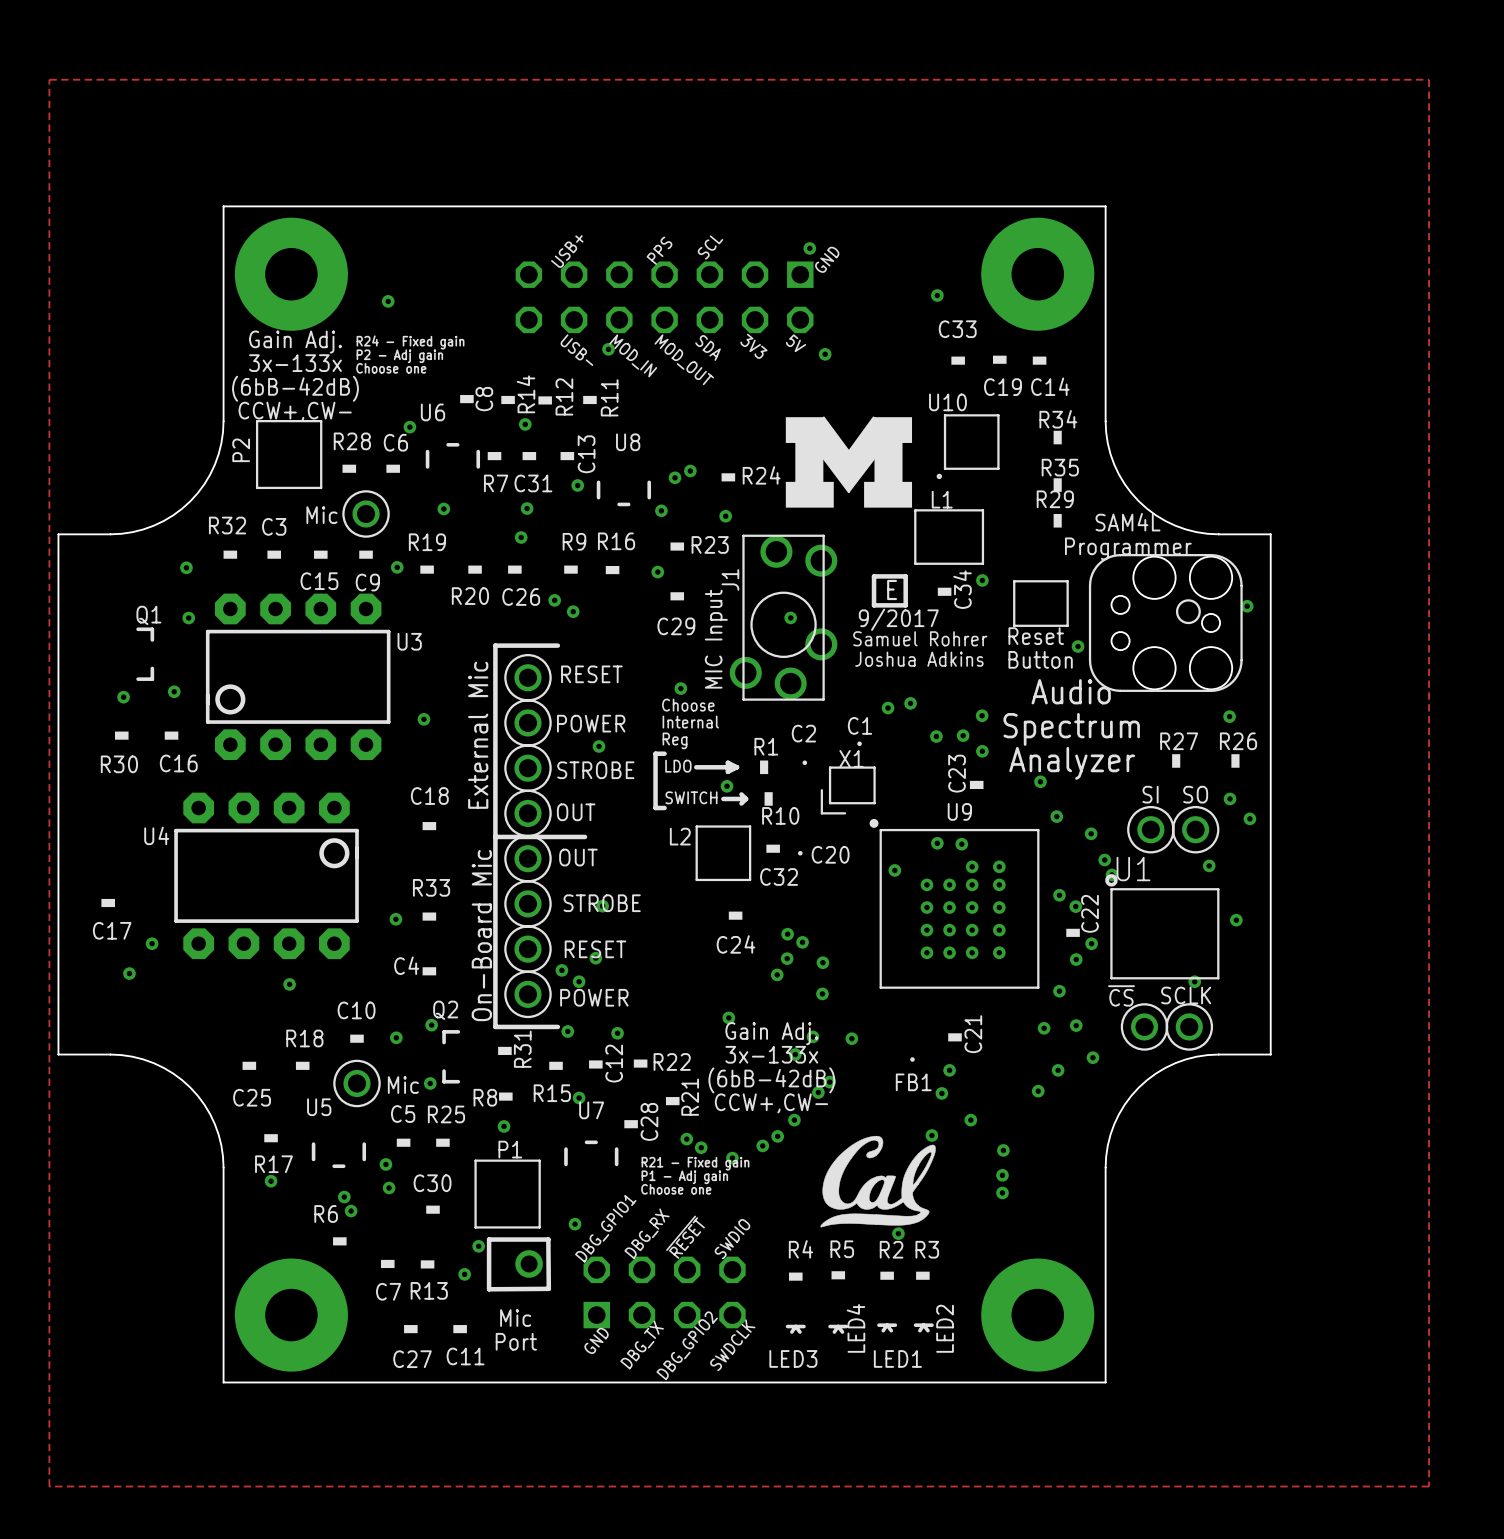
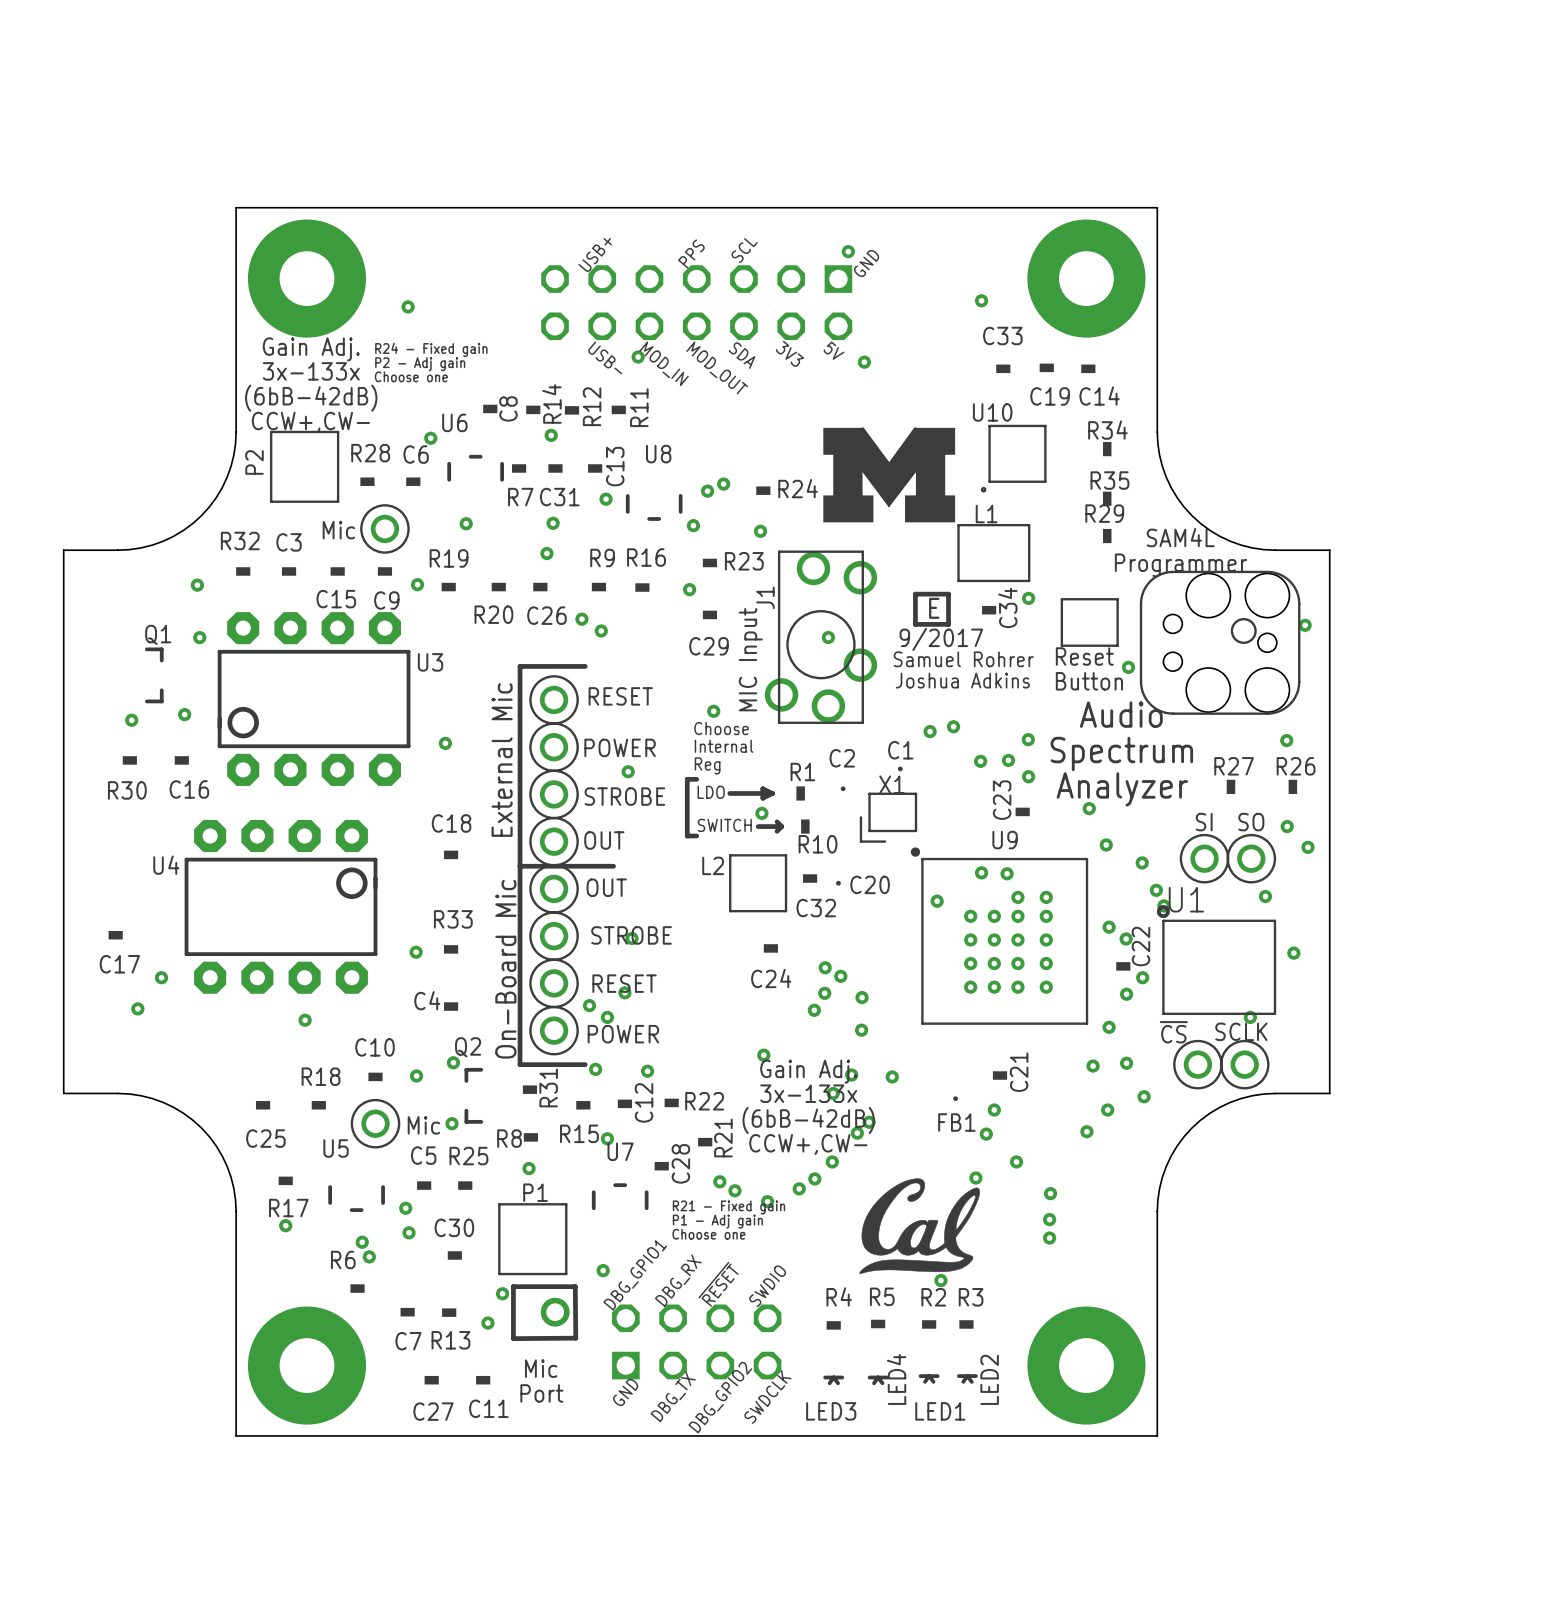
zone outline: (49, 79) (1429, 79) (1429, 1486) (49, 1486) (49, 79) -> none

